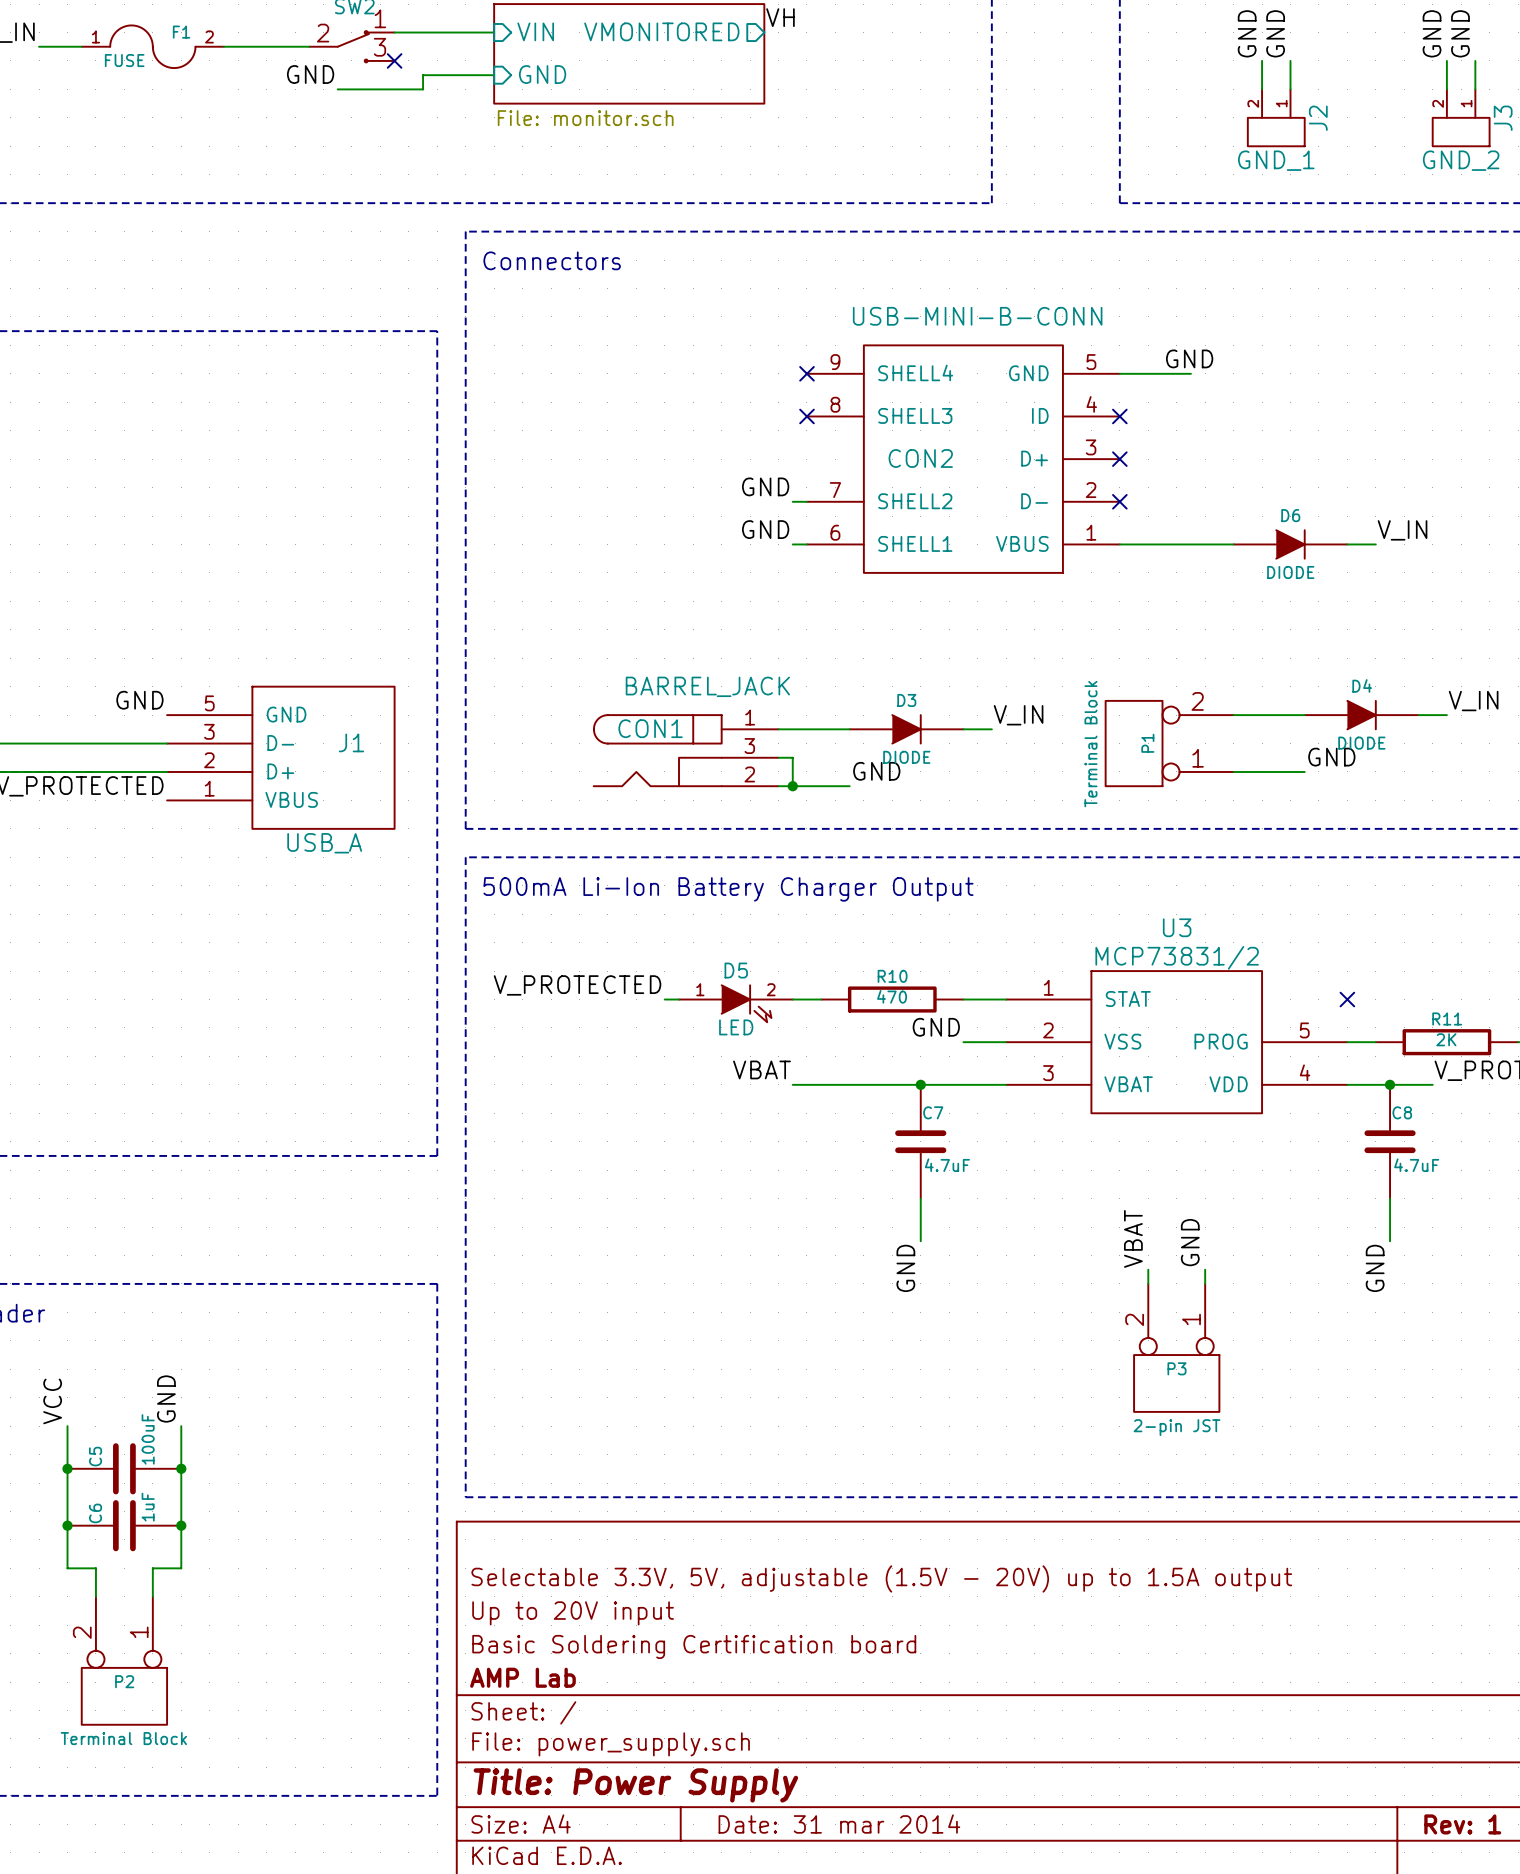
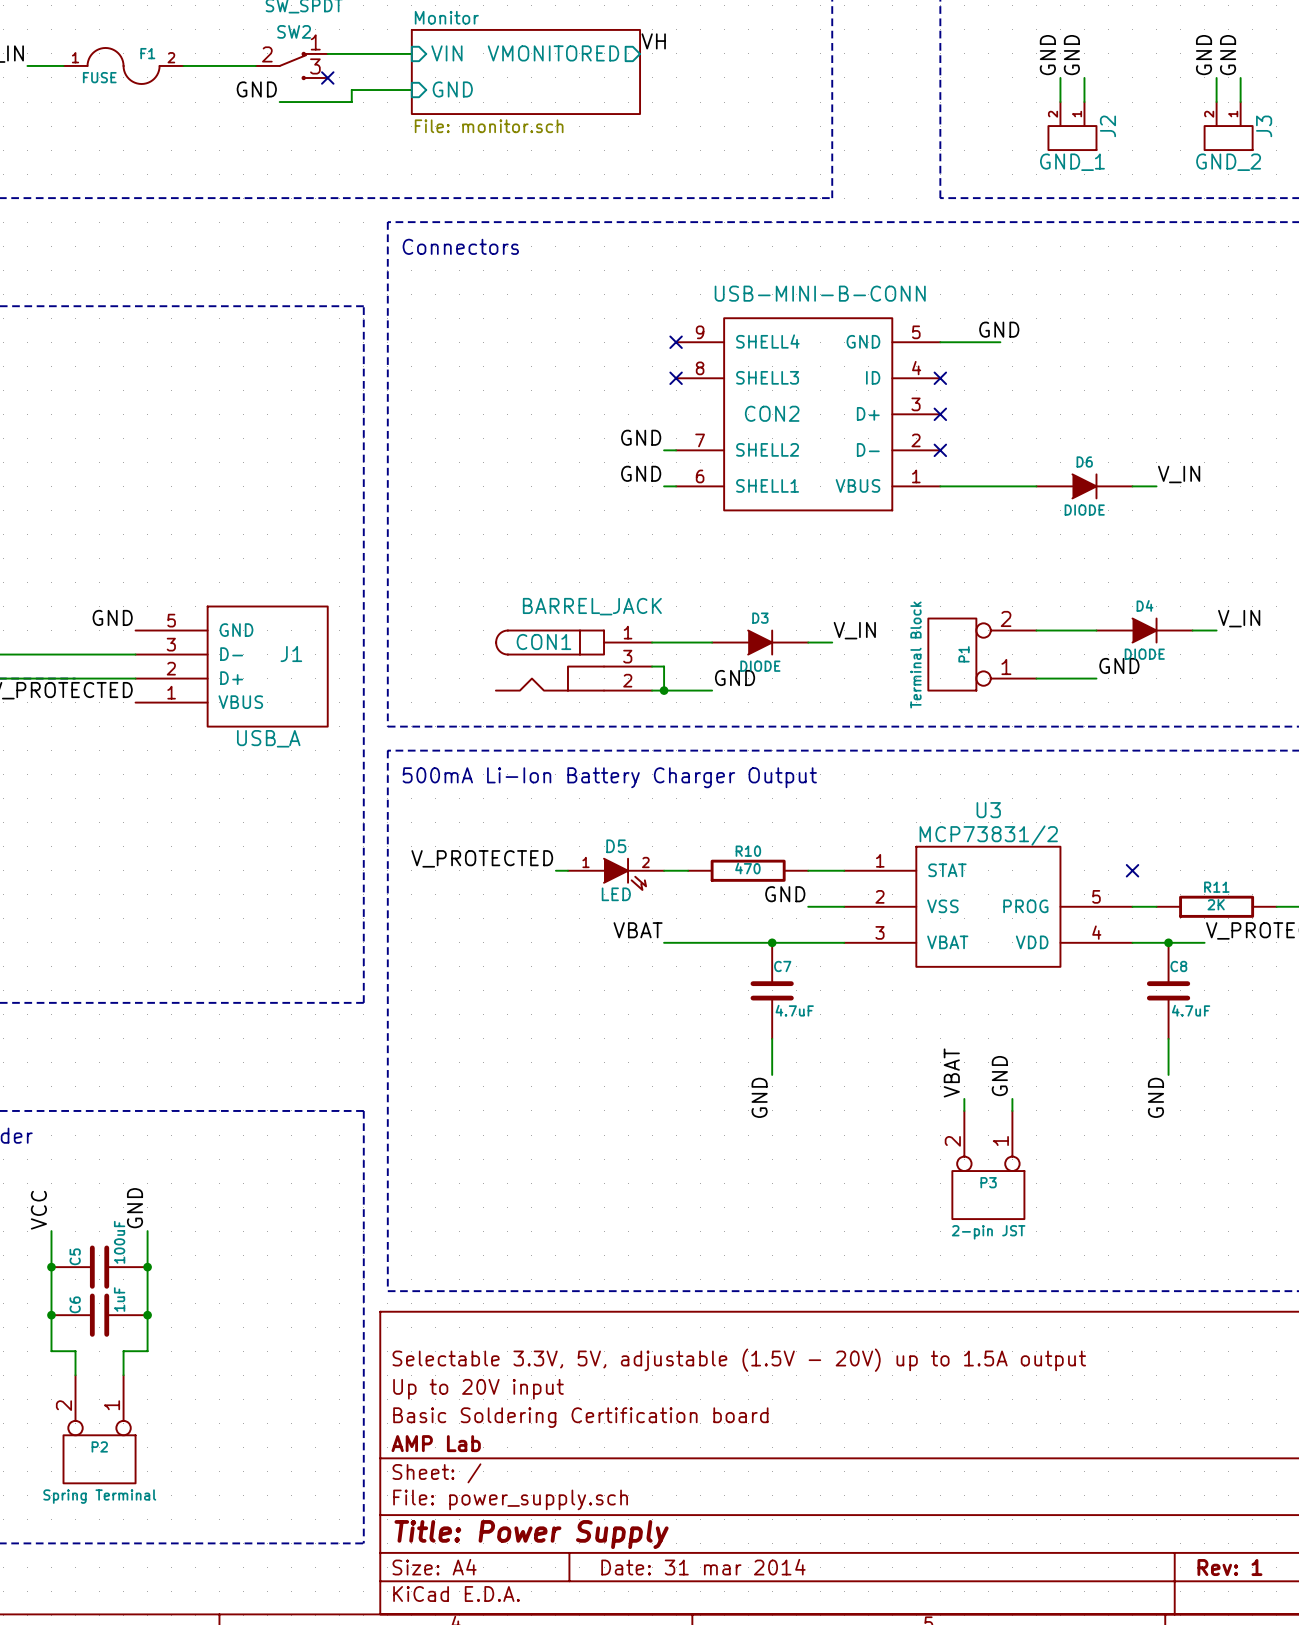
P2 value: Terminal Block (123, 1738) -> Spring Terminal (99, 1496)

